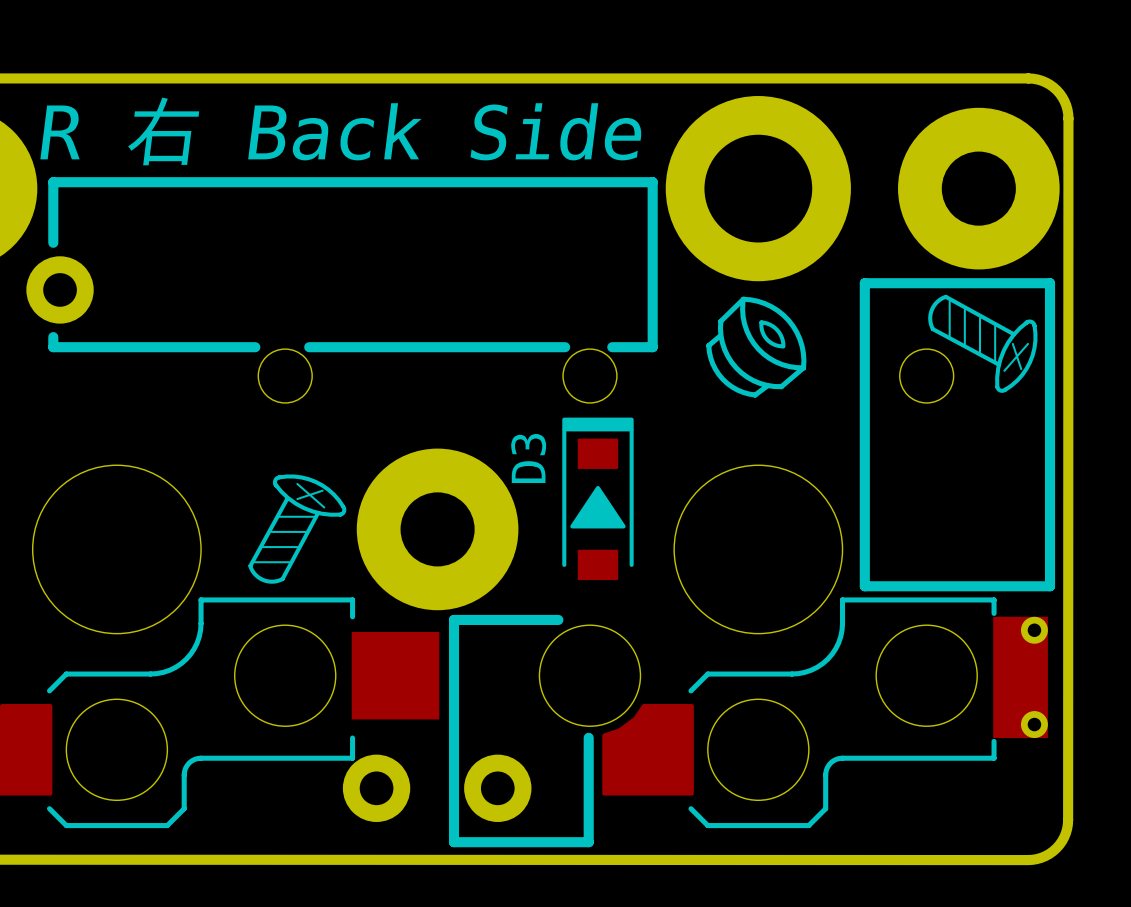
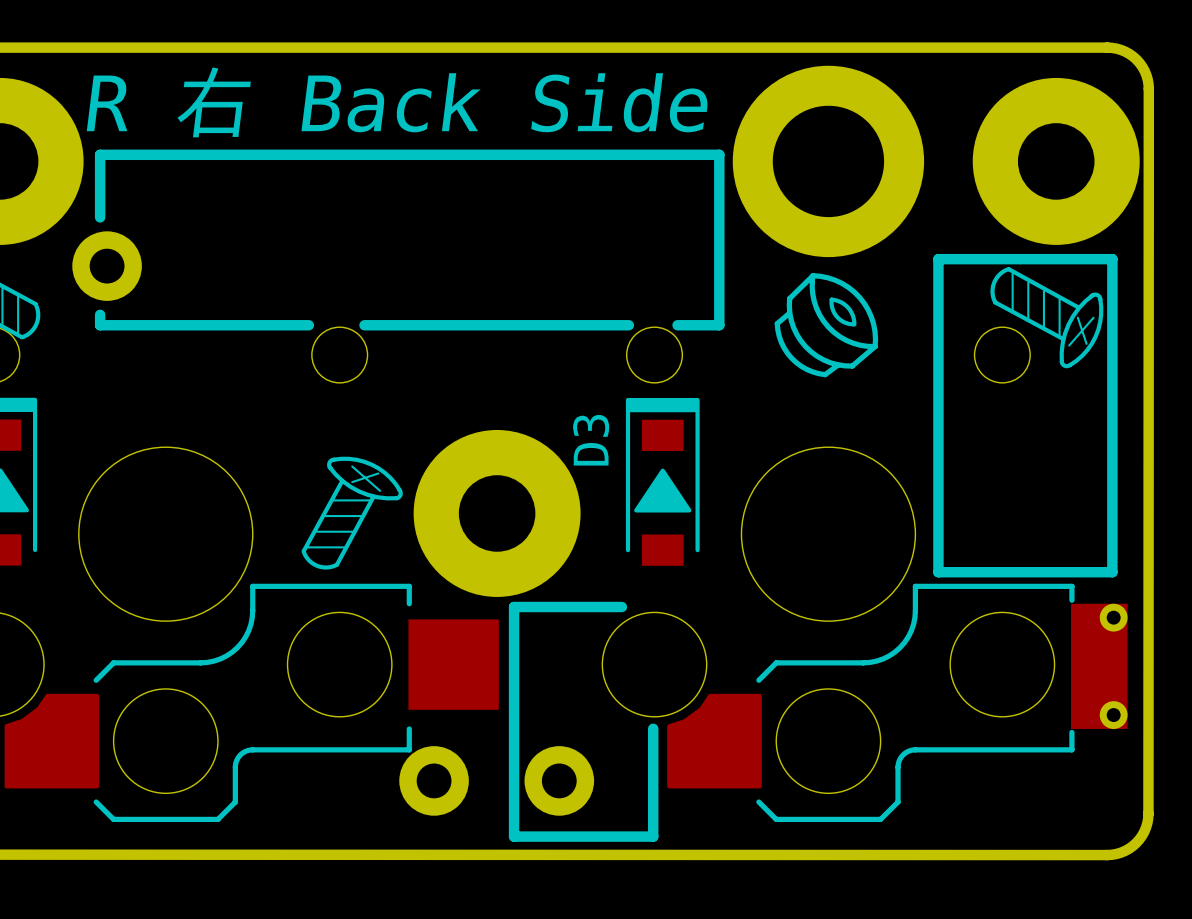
line: (1033, 283) (1050, 283) (1050, 586) (1033, 586) -> (1112, 259) (1112, 572)
drawing position: (982, 343) -> (1046, 317)

